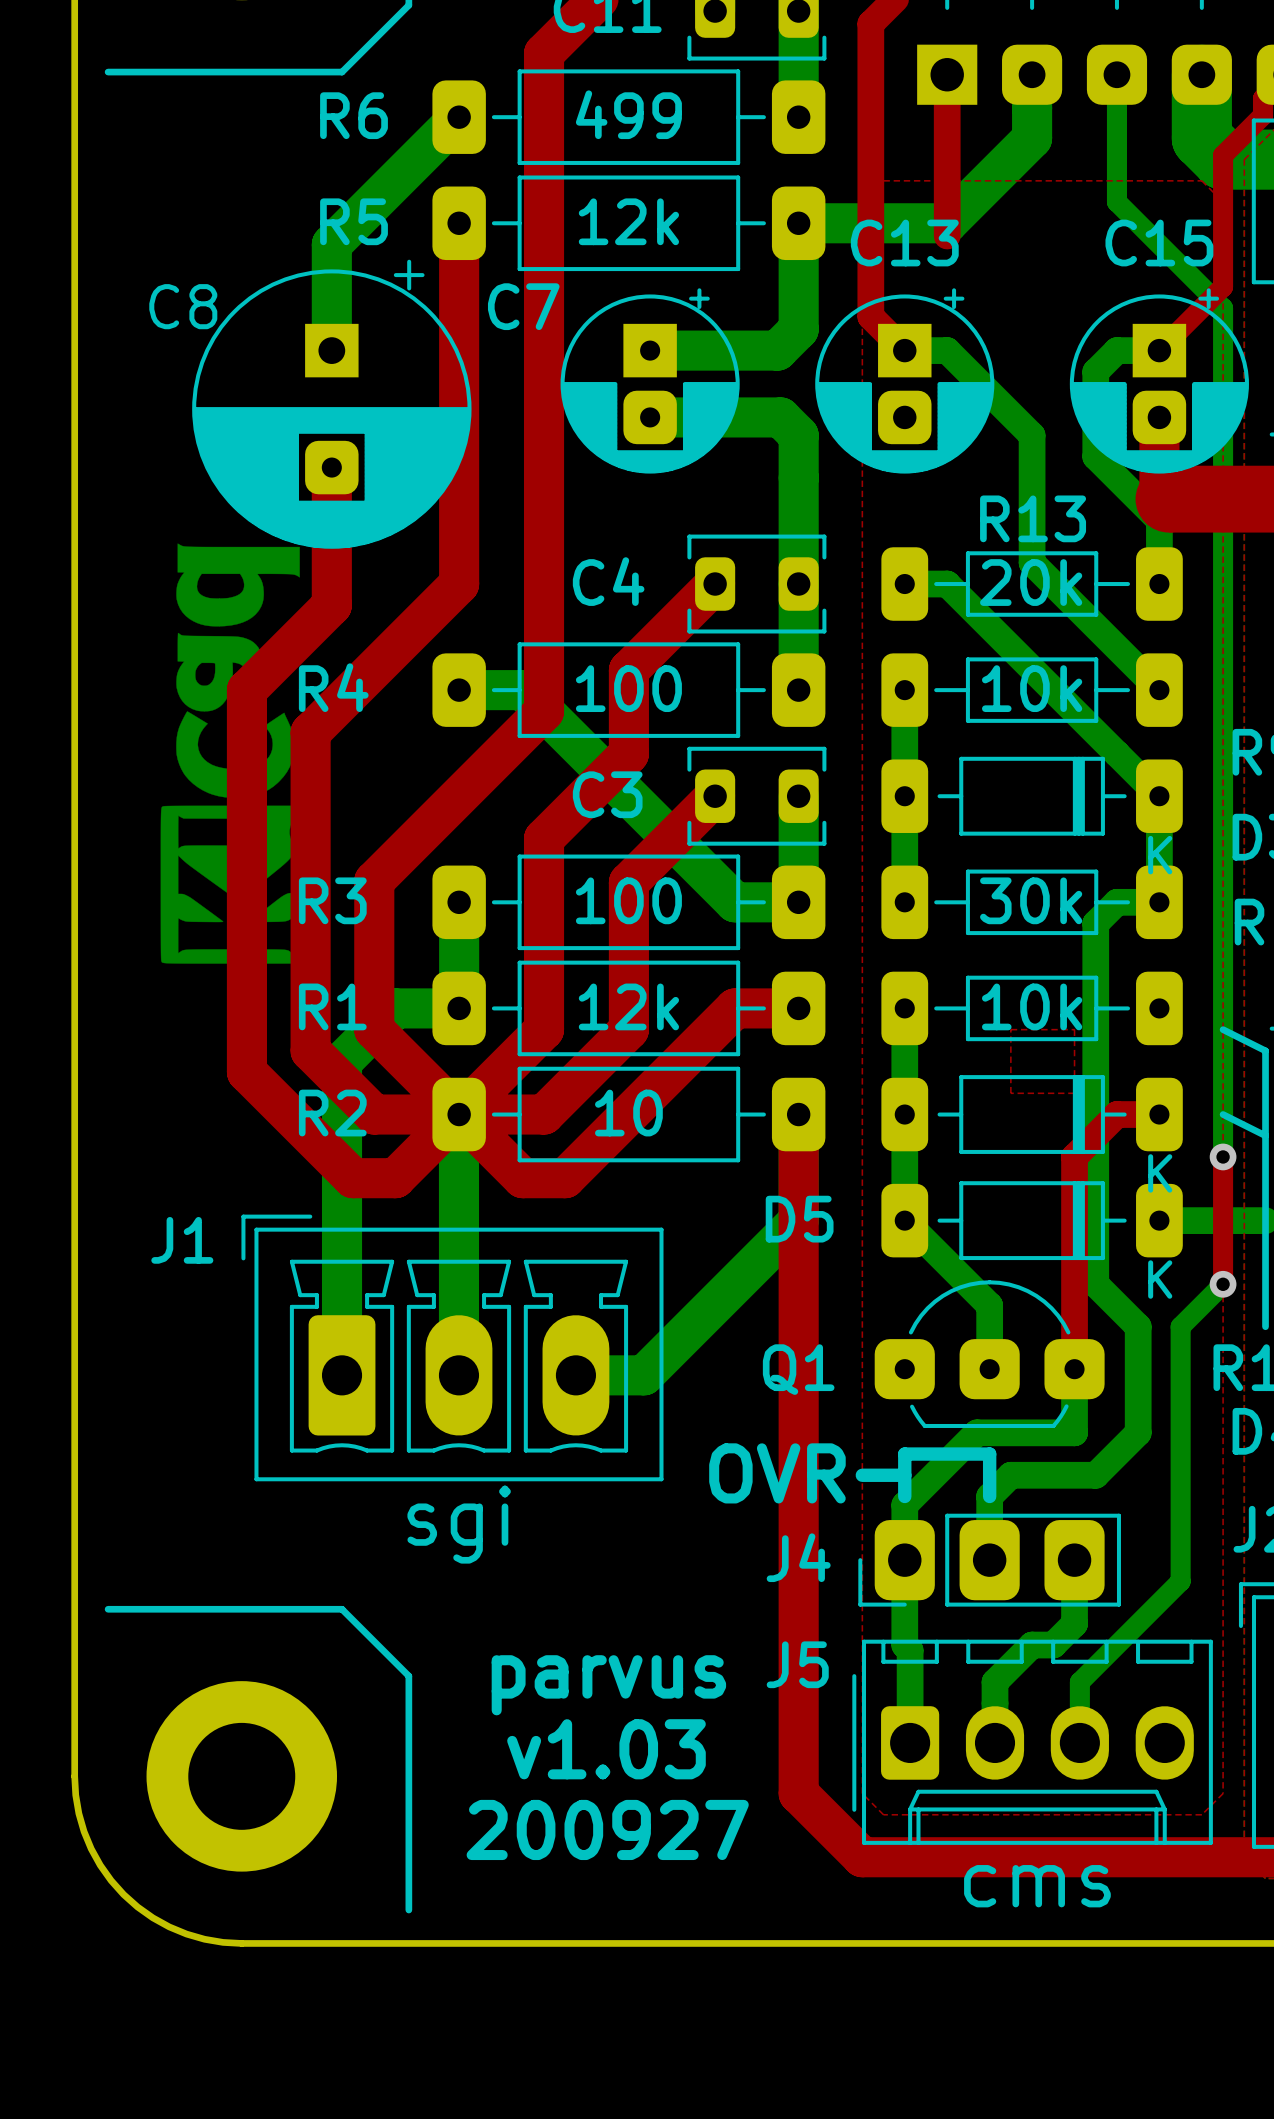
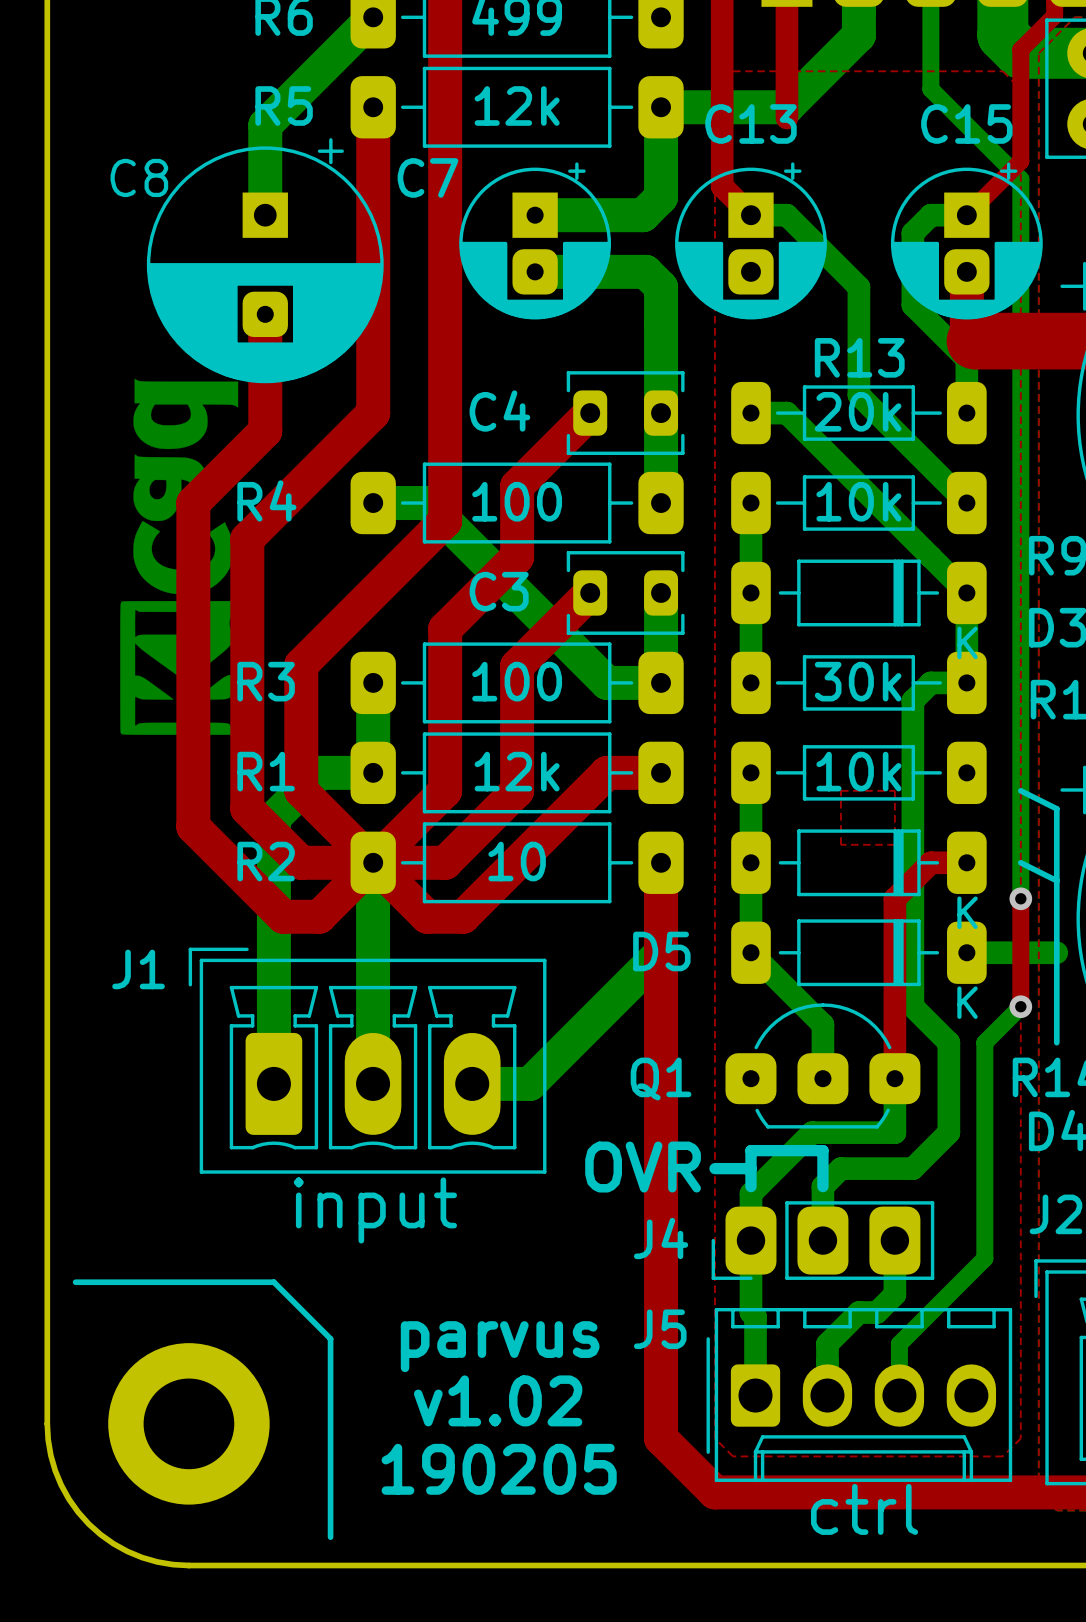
J1 value: sgi (459, 1524) -> input (375, 1210)
text: v1.03 (606, 1749) -> v1.02 (498, 1400)
text: 200927 (607, 1829) -> 190205 (499, 1469)
J5 value: cms (1037, 1886) -> ctrl (864, 1509)

